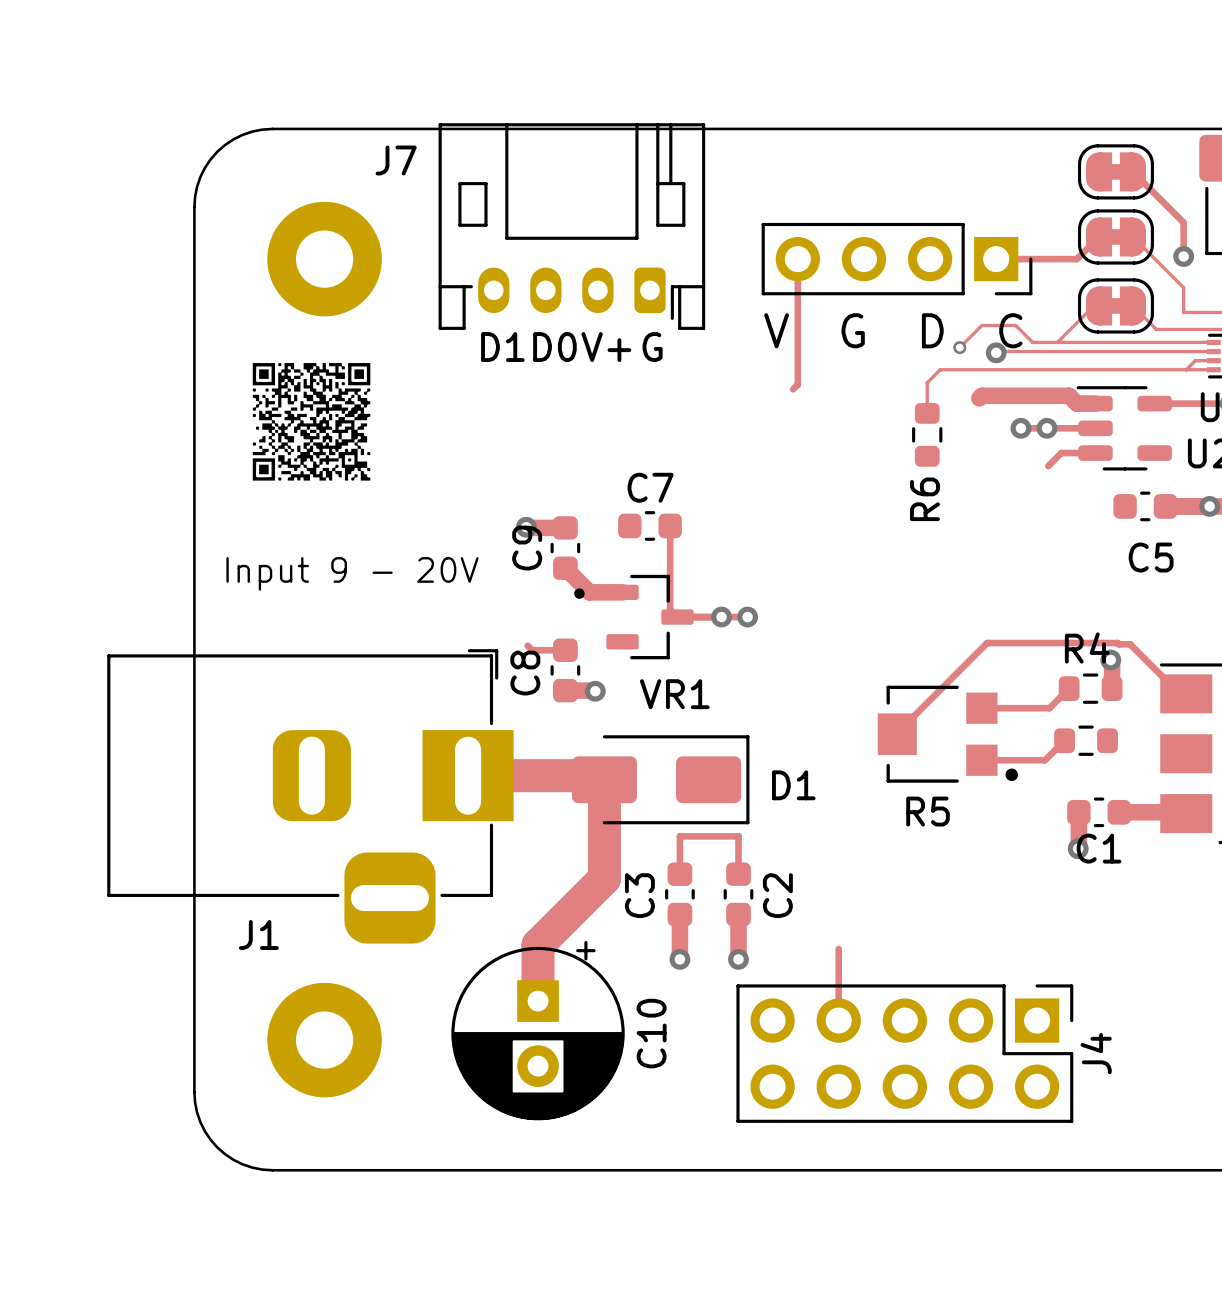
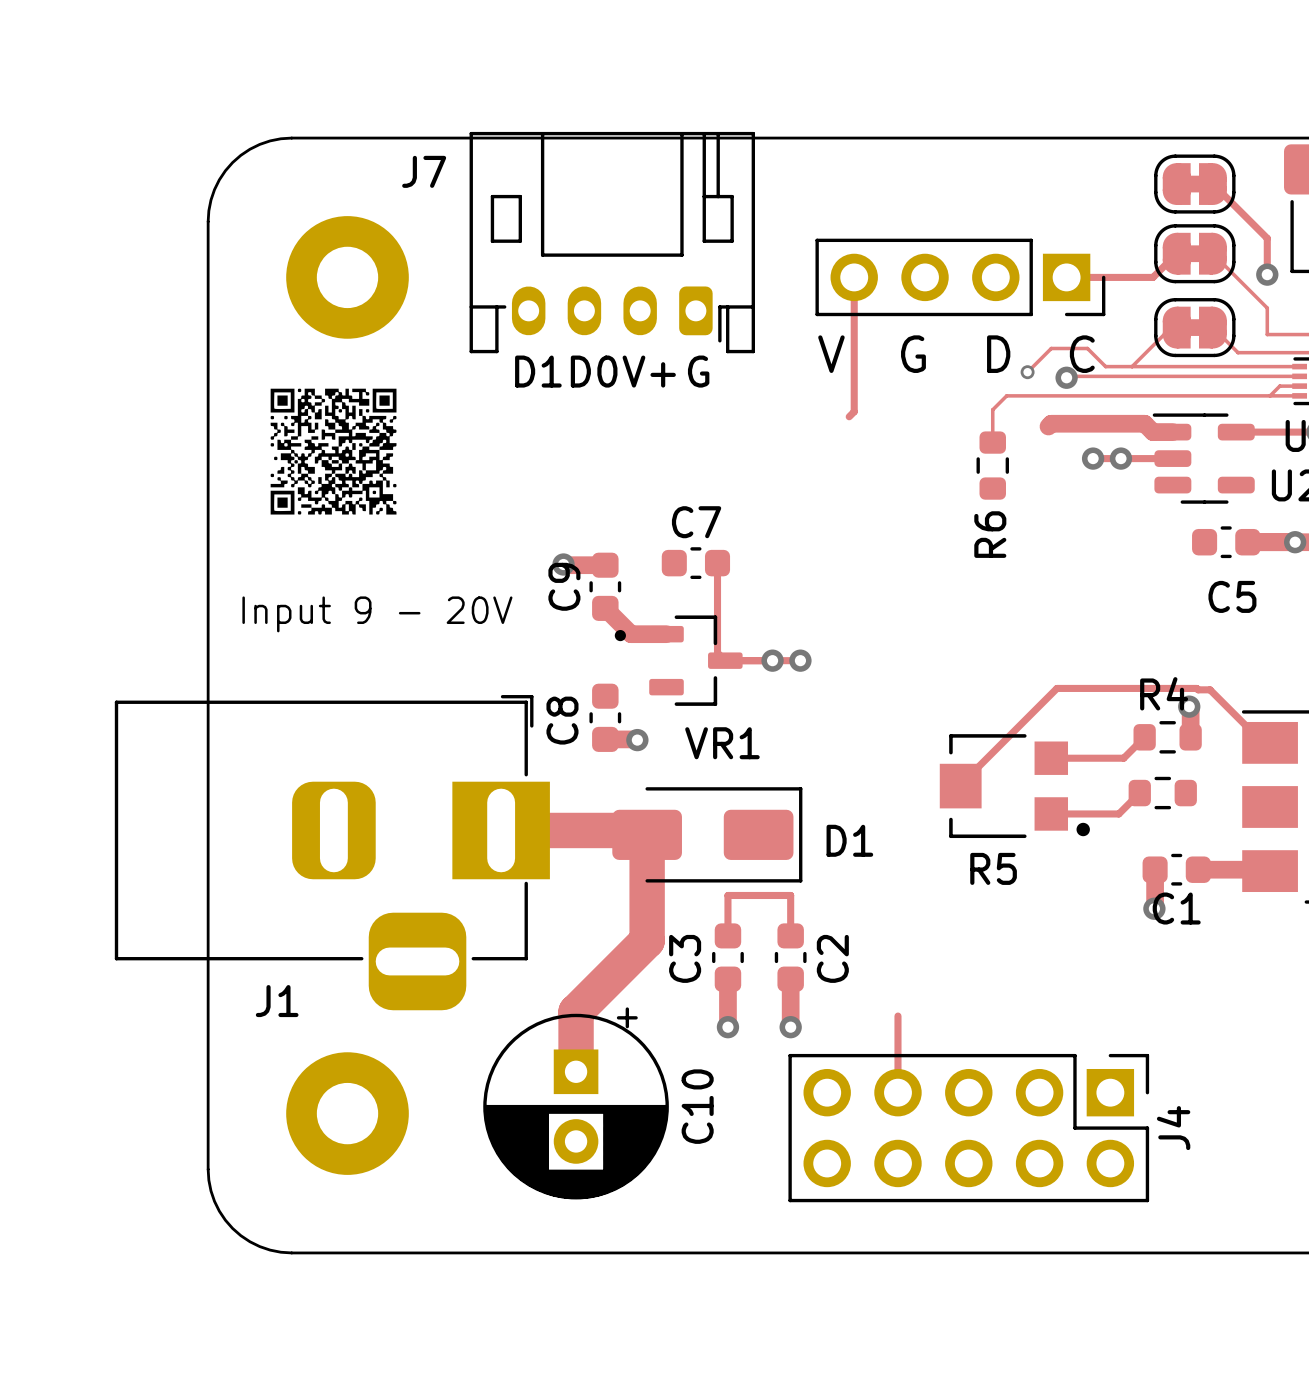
track: (1095, 453) (1061, 453) (1048, 466) -> none
track: (527, 645) (532, 650) (565, 650) -> none

